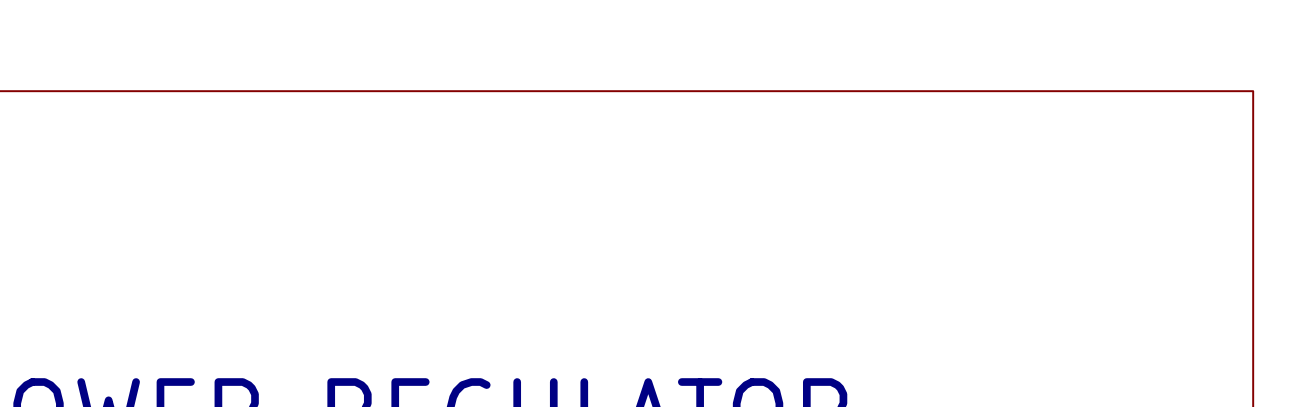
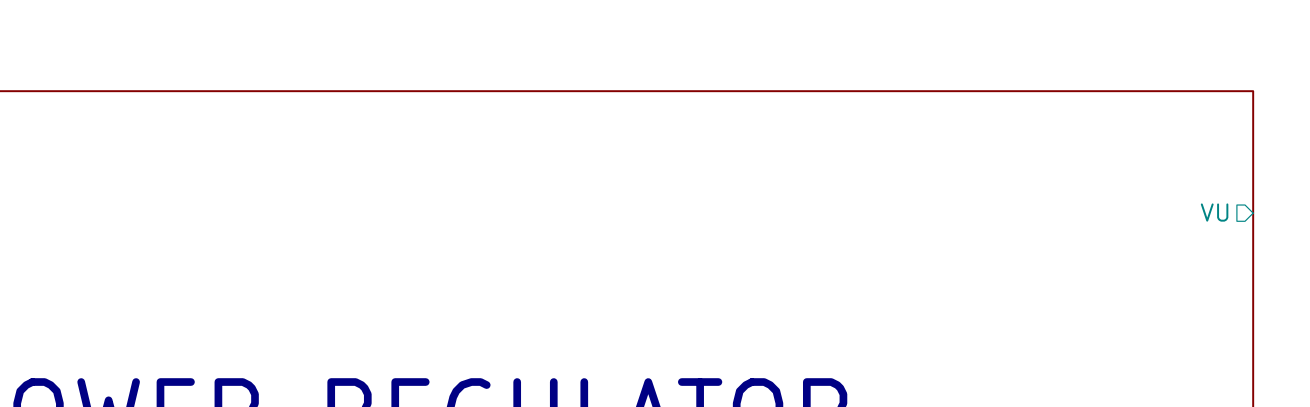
sheet pin: none -> VU (1214, 212)

